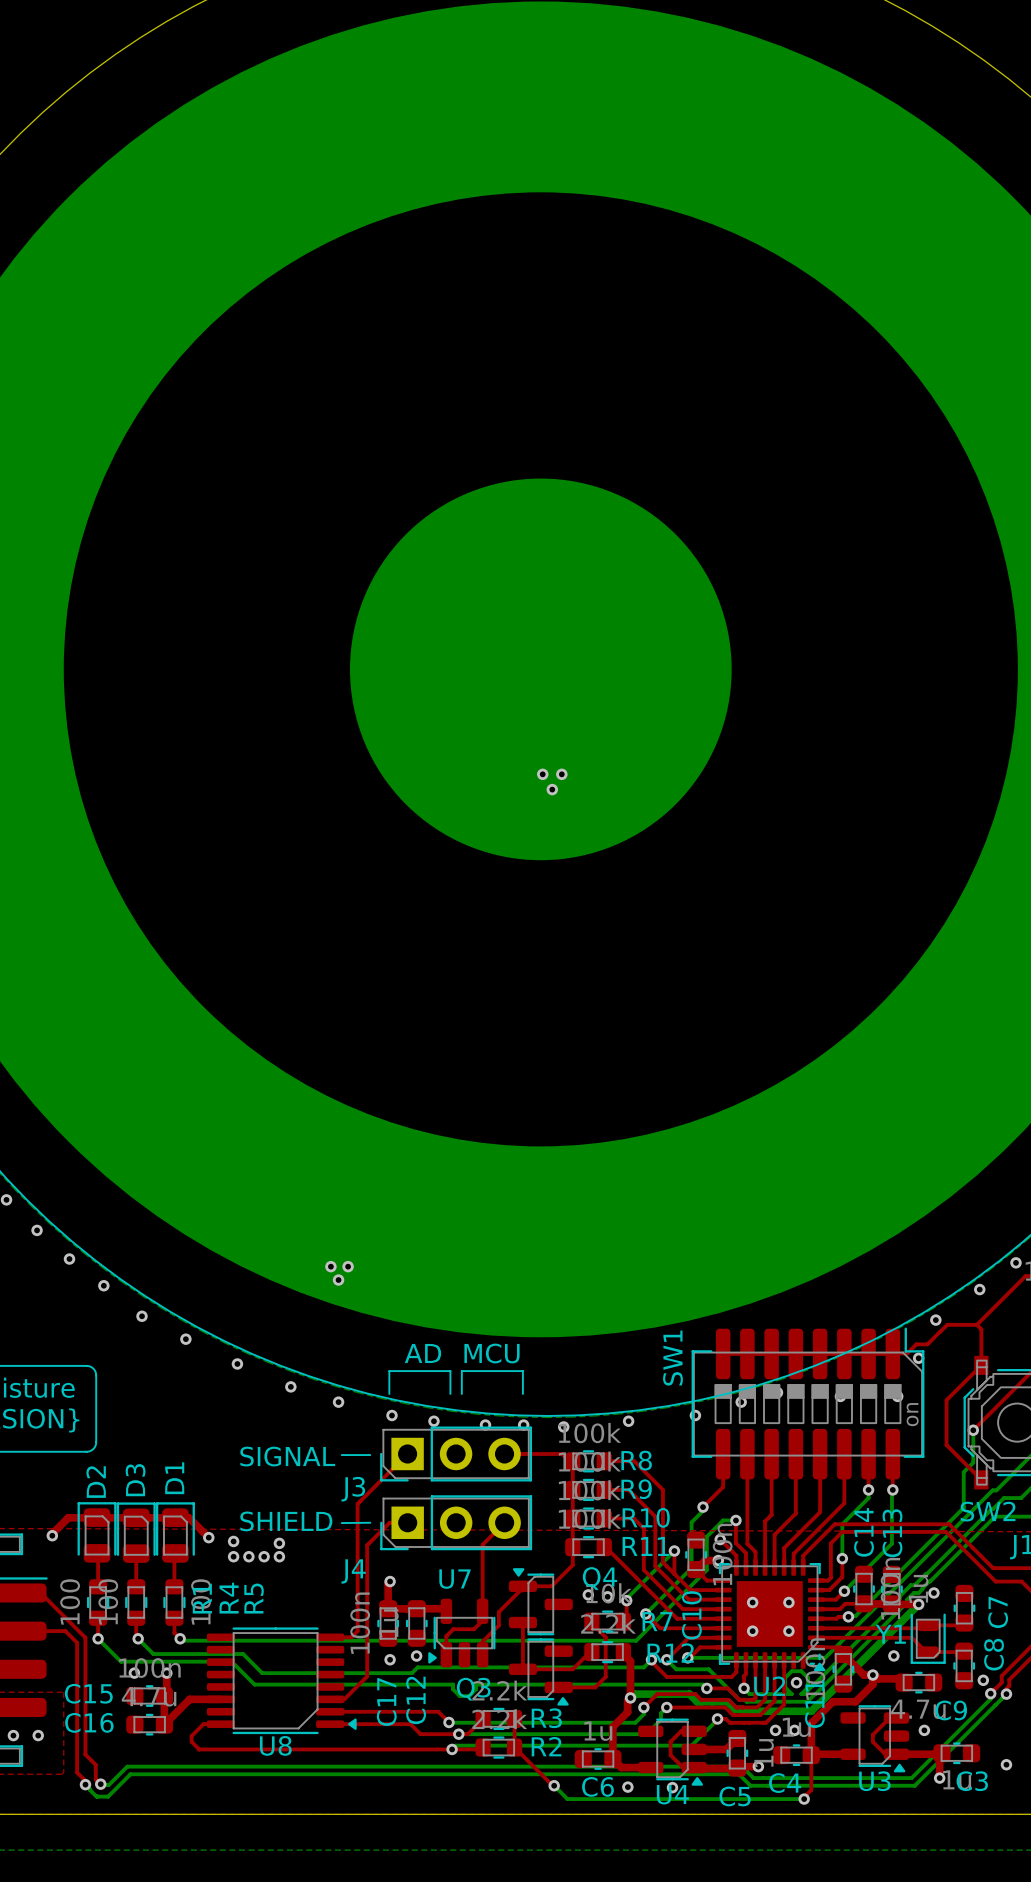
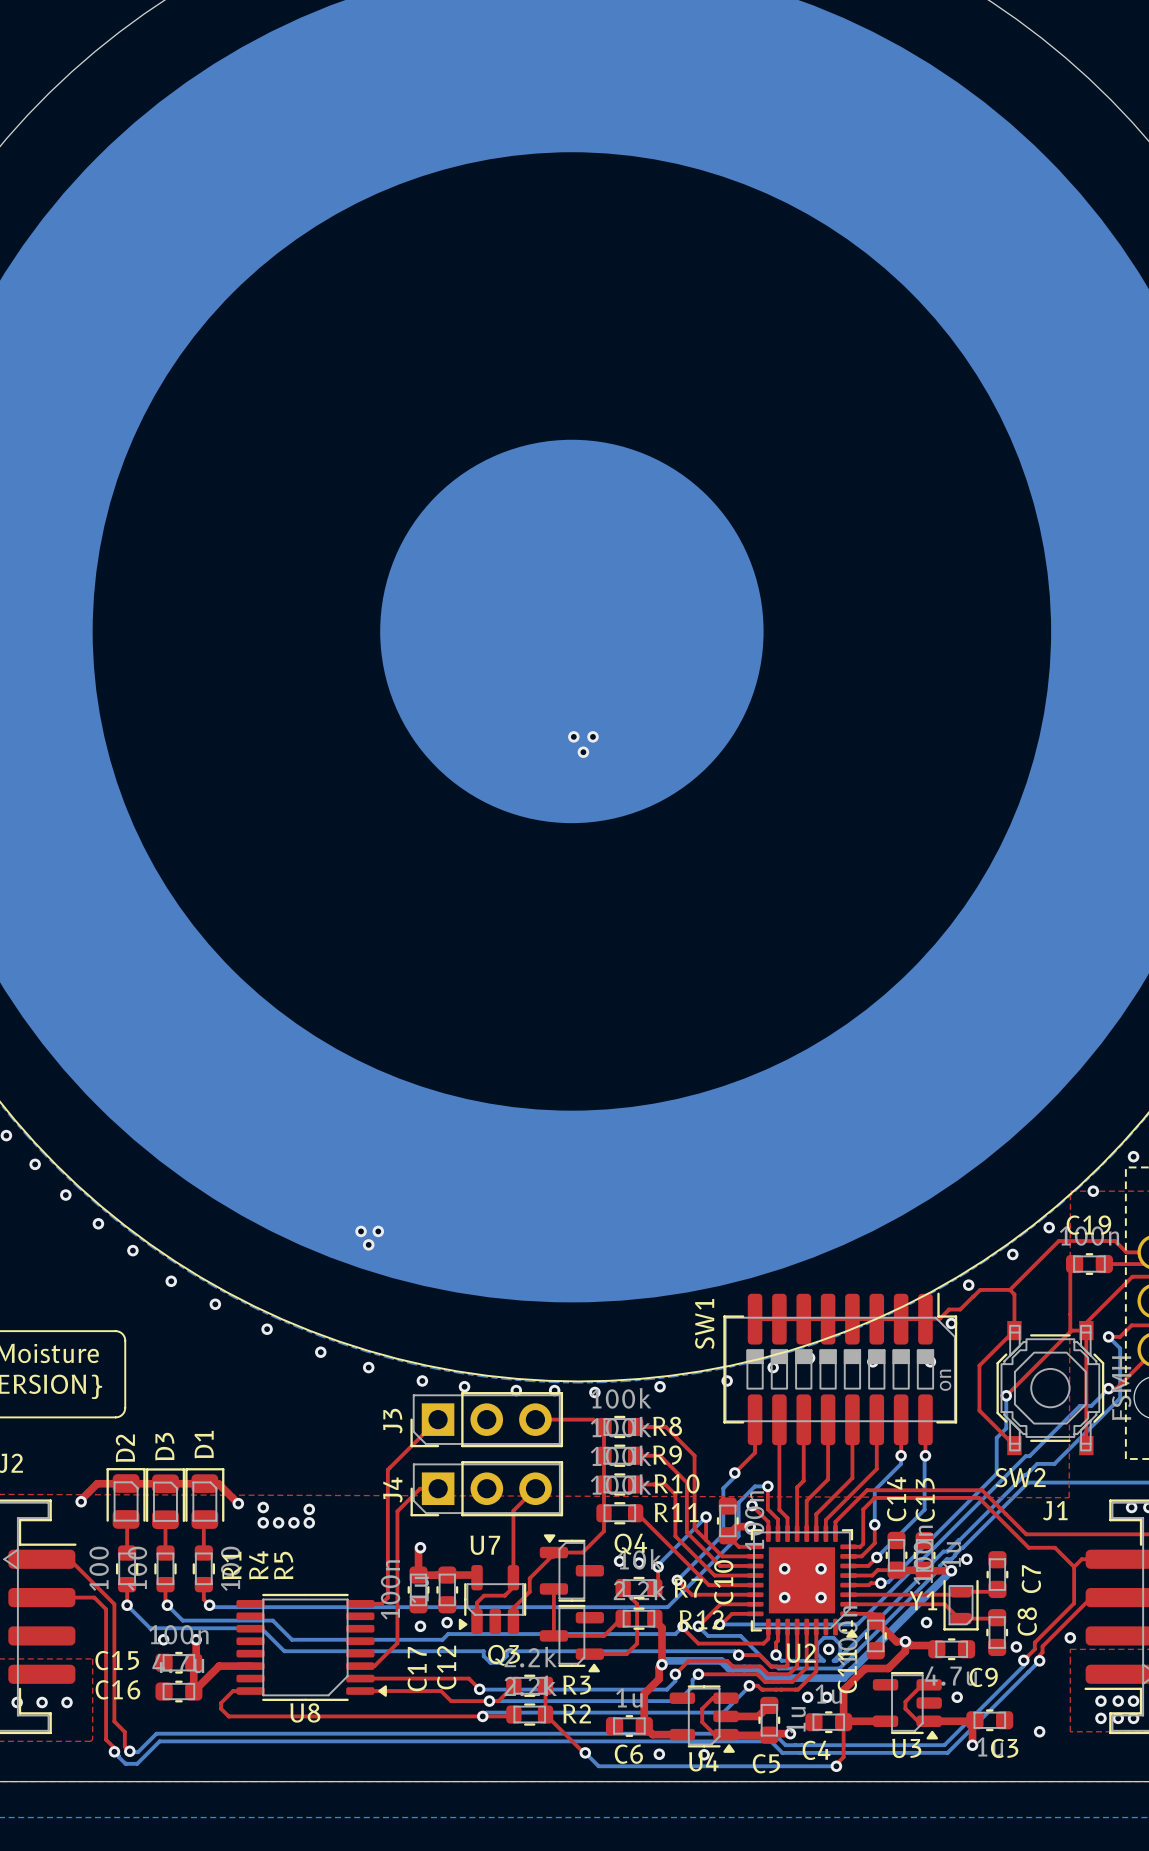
text: AD (422, 1353) -> none
text: MCU (492, 1353) -> none
line: (389, 1393) (389, 1371) (450, 1371) (450, 1393) -> none
line: (461, 1393) (461, 1371) (522, 1371) (522, 1393) -> none
line: (341, 1455) (370, 1455) -> none
text: SIGNAL (287, 1456) -> none
J3 name rotation: 0° (353, 1489) -> 90° counterclockwise (392, 1421)
text: SHIELD (286, 1521) -> none
line: (370, 1522) (341, 1523) -> none
J4 name rotation: 0° (353, 1571) -> 90° counterclockwise (392, 1489)
J4 name position: J4 (353, 1571) -> J4 (392, 1489)

